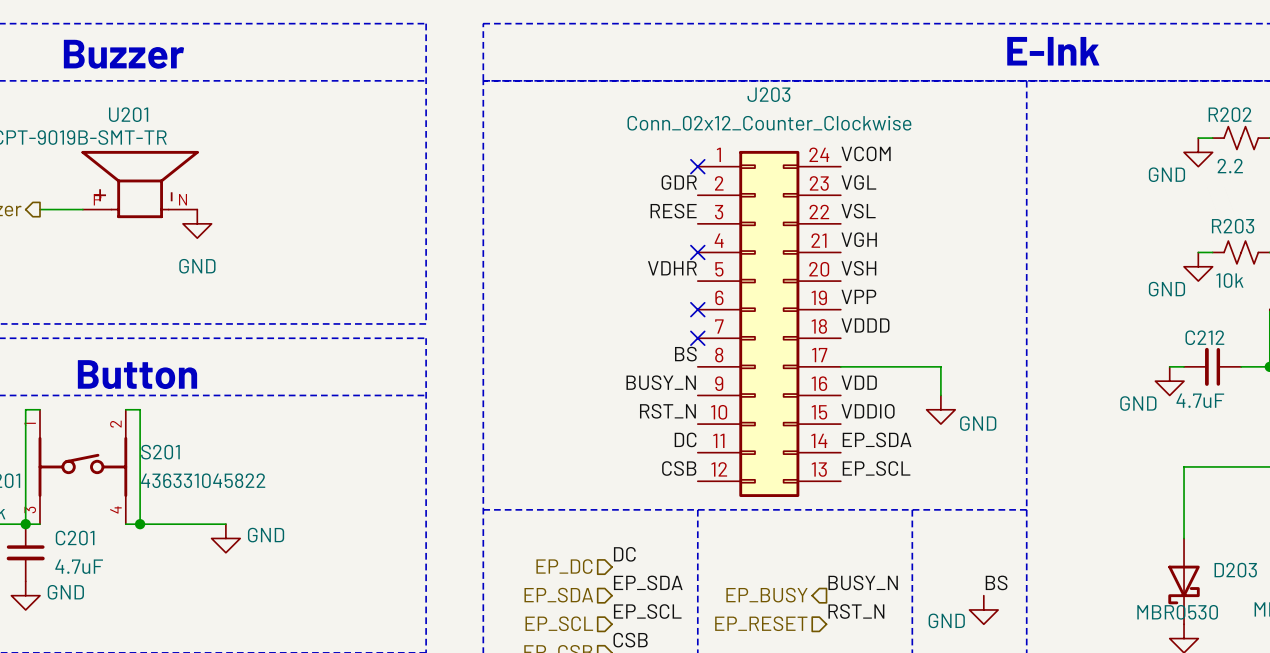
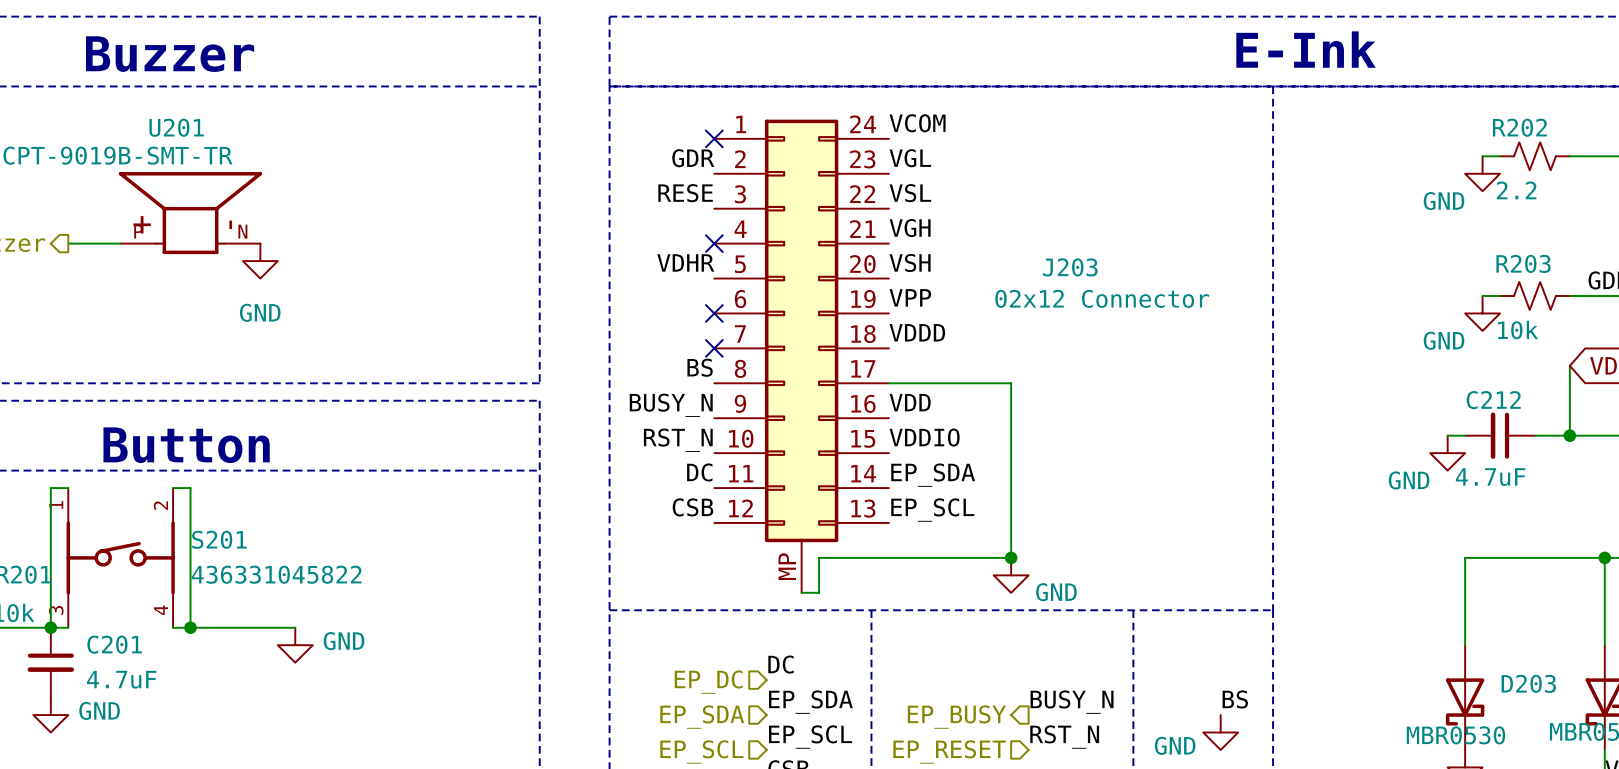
J203 name position: J203 (768, 94) -> J203 (1070, 267)
no-connect mark: none -> (714, 138)
J203 value: Conn_02x12_Counter_Clockwise (769, 123) -> 02x12 Connector (1102, 298)
J203 symbol: [697, 150, 841, 498] -> [714, 119, 889, 593]
label position: VCOM (866, 153) -> VCOM (917, 123)
no-connect mark: (697, 166) -> none
label position: GDR (679, 182) -> GDR (693, 158)
label position: VGL (858, 182) -> VGL (910, 158)
no-connect mark: none -> (714, 243)
label position: RESE (673, 211) -> RESE (685, 193)
label position: VSL (858, 211) -> VSL (910, 193)
label position: VGH (859, 239) -> VGH (910, 228)
no-connect mark: (697, 252) -> none
no-connect mark: none -> (714, 313)
label position: VDHR (672, 268) -> VDHR (685, 262)
label position: VSH (858, 268) -> VSH (910, 262)
no-connect mark: none -> (714, 348)
label position: VPP (858, 296) -> VPP (910, 297)
no-connect mark: (697, 309) -> none
wire: none -> (888, 383) (1011, 383) (1011, 557) (819, 557) (819, 592) (801, 592)
label position: VDDD (865, 325) -> VDDD (917, 332)
no-connect mark: (697, 338) -> none
label position: BS (685, 354) -> BS (700, 367)
wire: (840, 366) (940, 366) (940, 395) -> none
label position: BUSY_N (661, 382) -> BUSY_N (671, 405)
label position: VDD (859, 382) -> VDD (910, 402)
power symbol position: GND (940, 409) -> GND (1011, 575)
label position: RST_N (667, 411) -> RST_N (678, 440)
label position: VDDIO (868, 411) -> VDDIO (924, 437)
label position: DC (685, 439) -> DC (699, 472)
label position: EP_SDA (877, 439) -> EP_SDA (933, 475)
junction: none -> (1011, 557)
label position: CSB (679, 468) -> CSB (692, 507)
label position: EP_SCL (876, 468) -> EP_SCL (932, 510)

